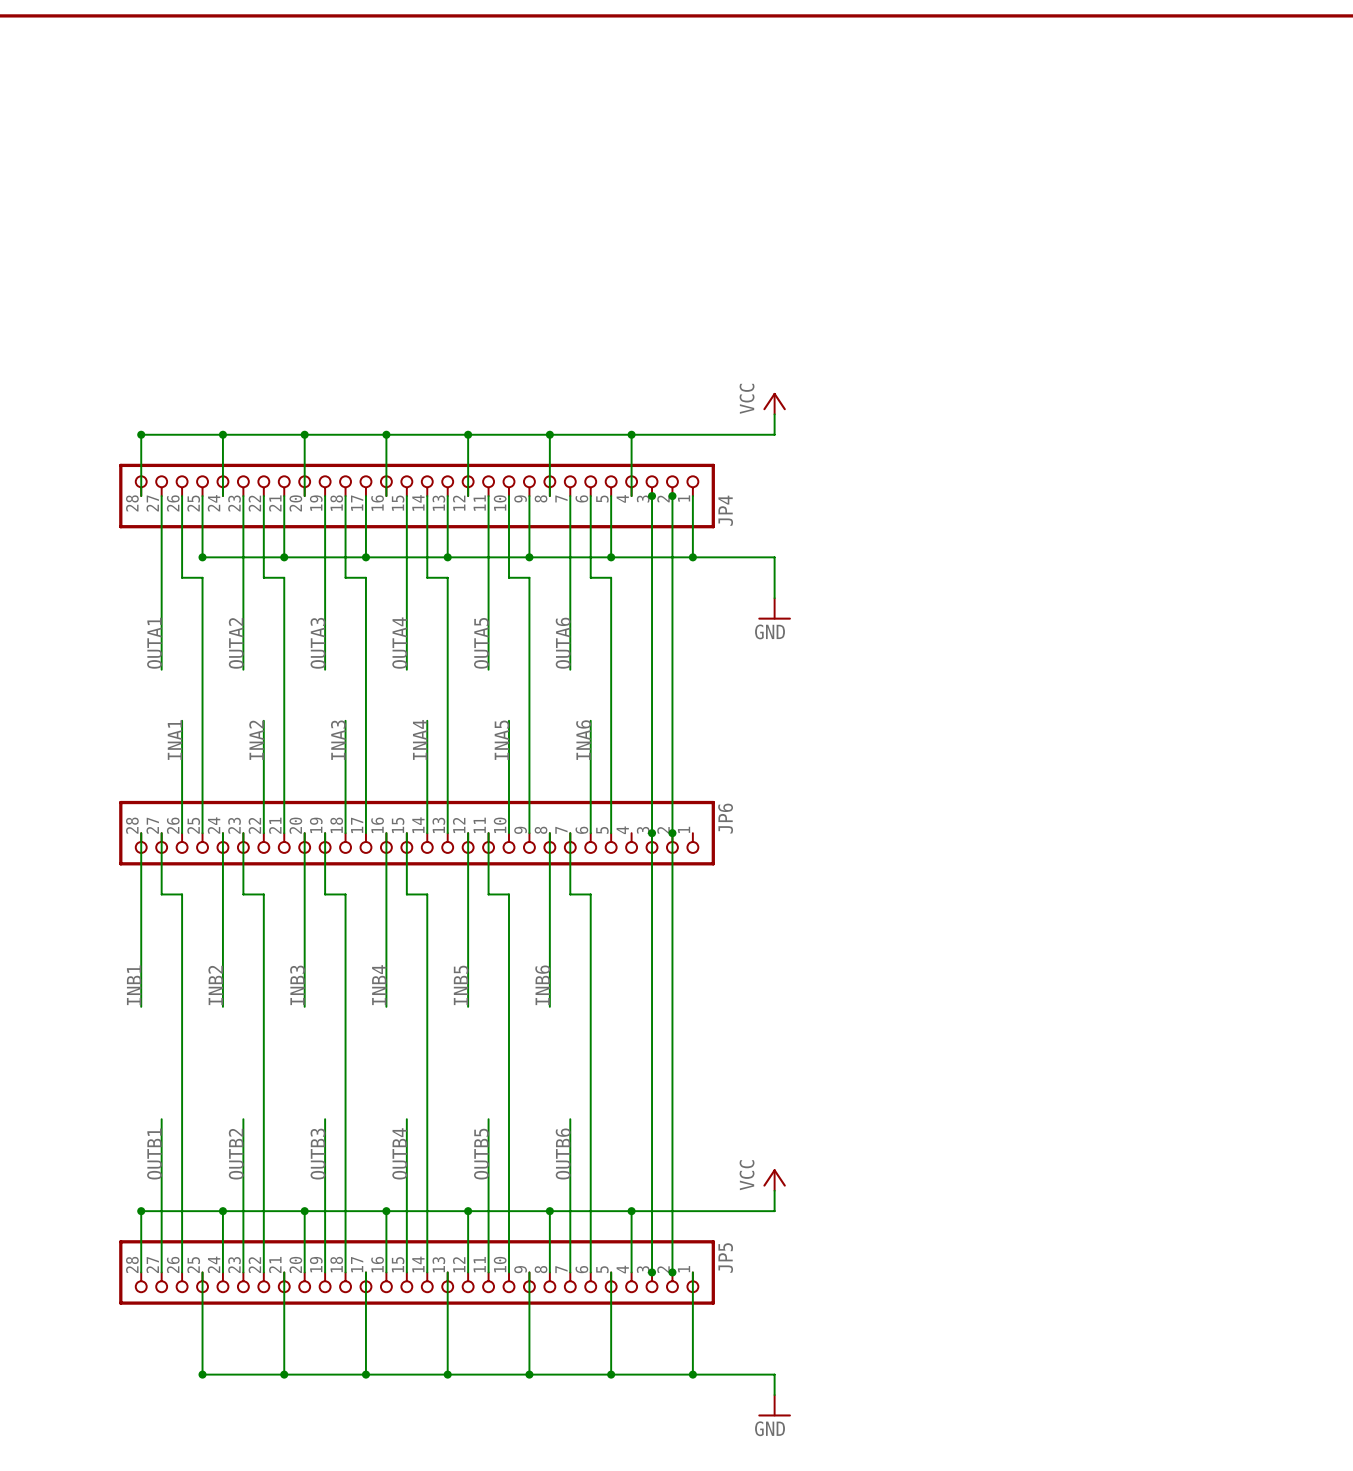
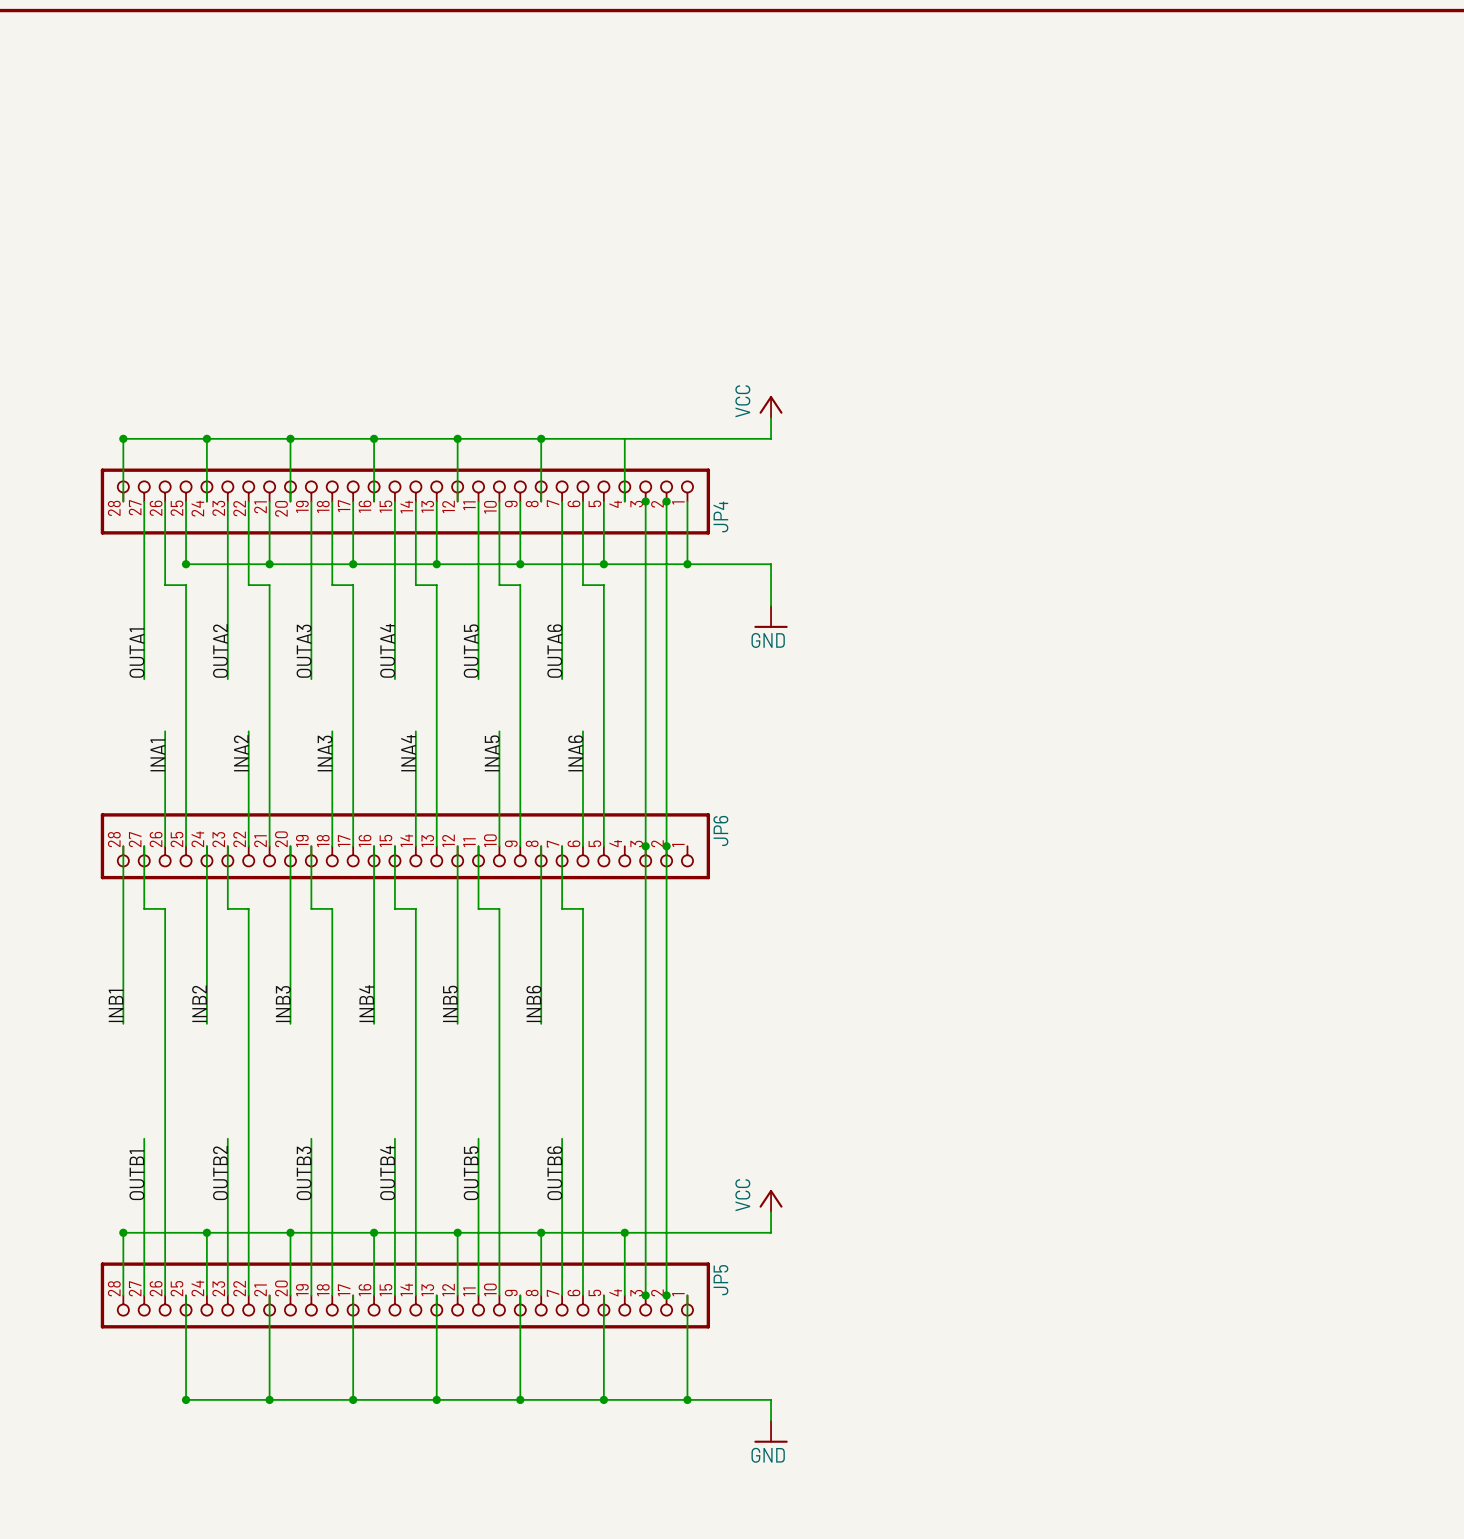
junction: (631, 434) -> none

